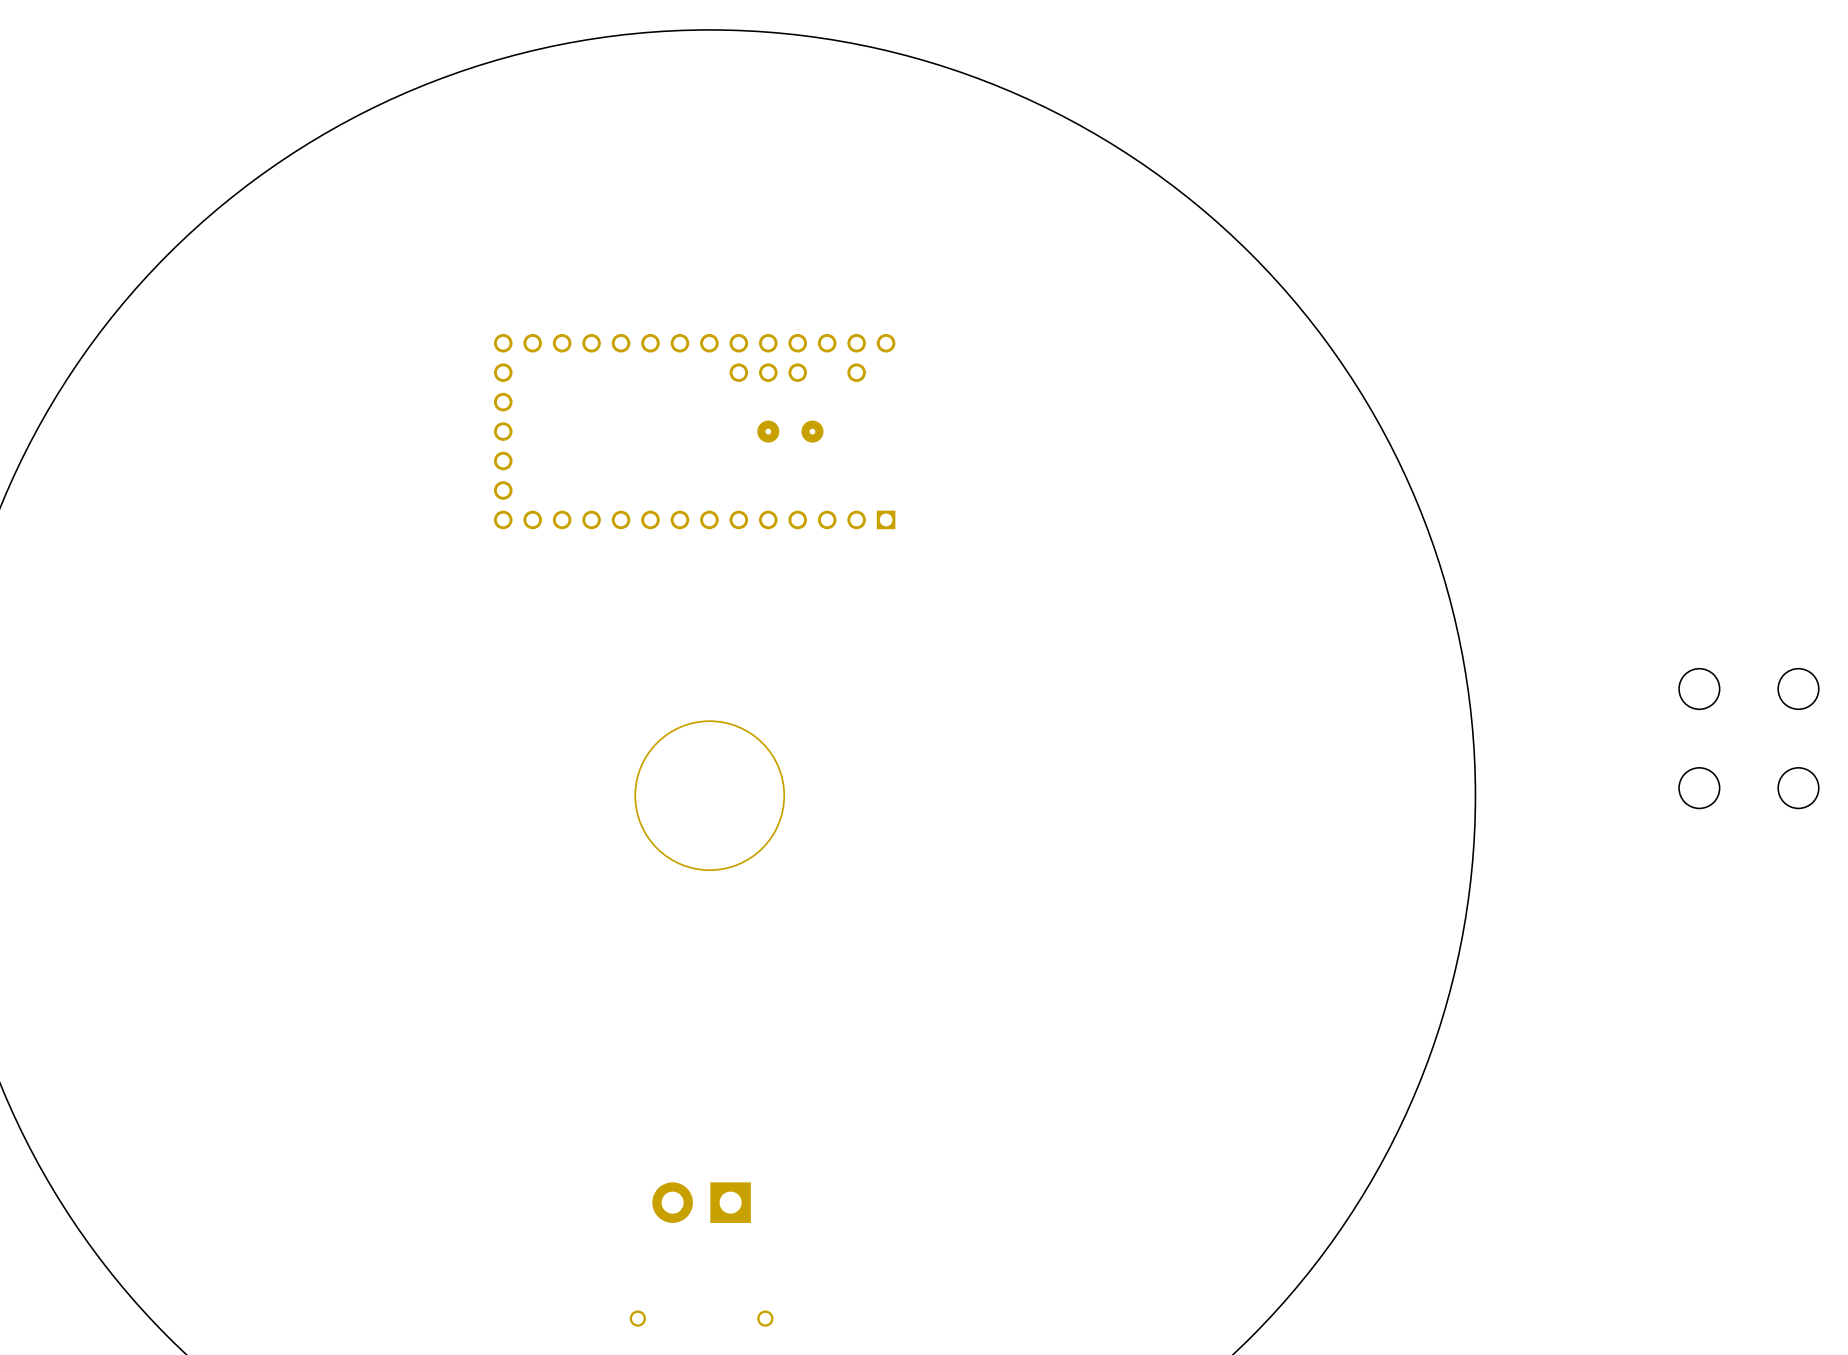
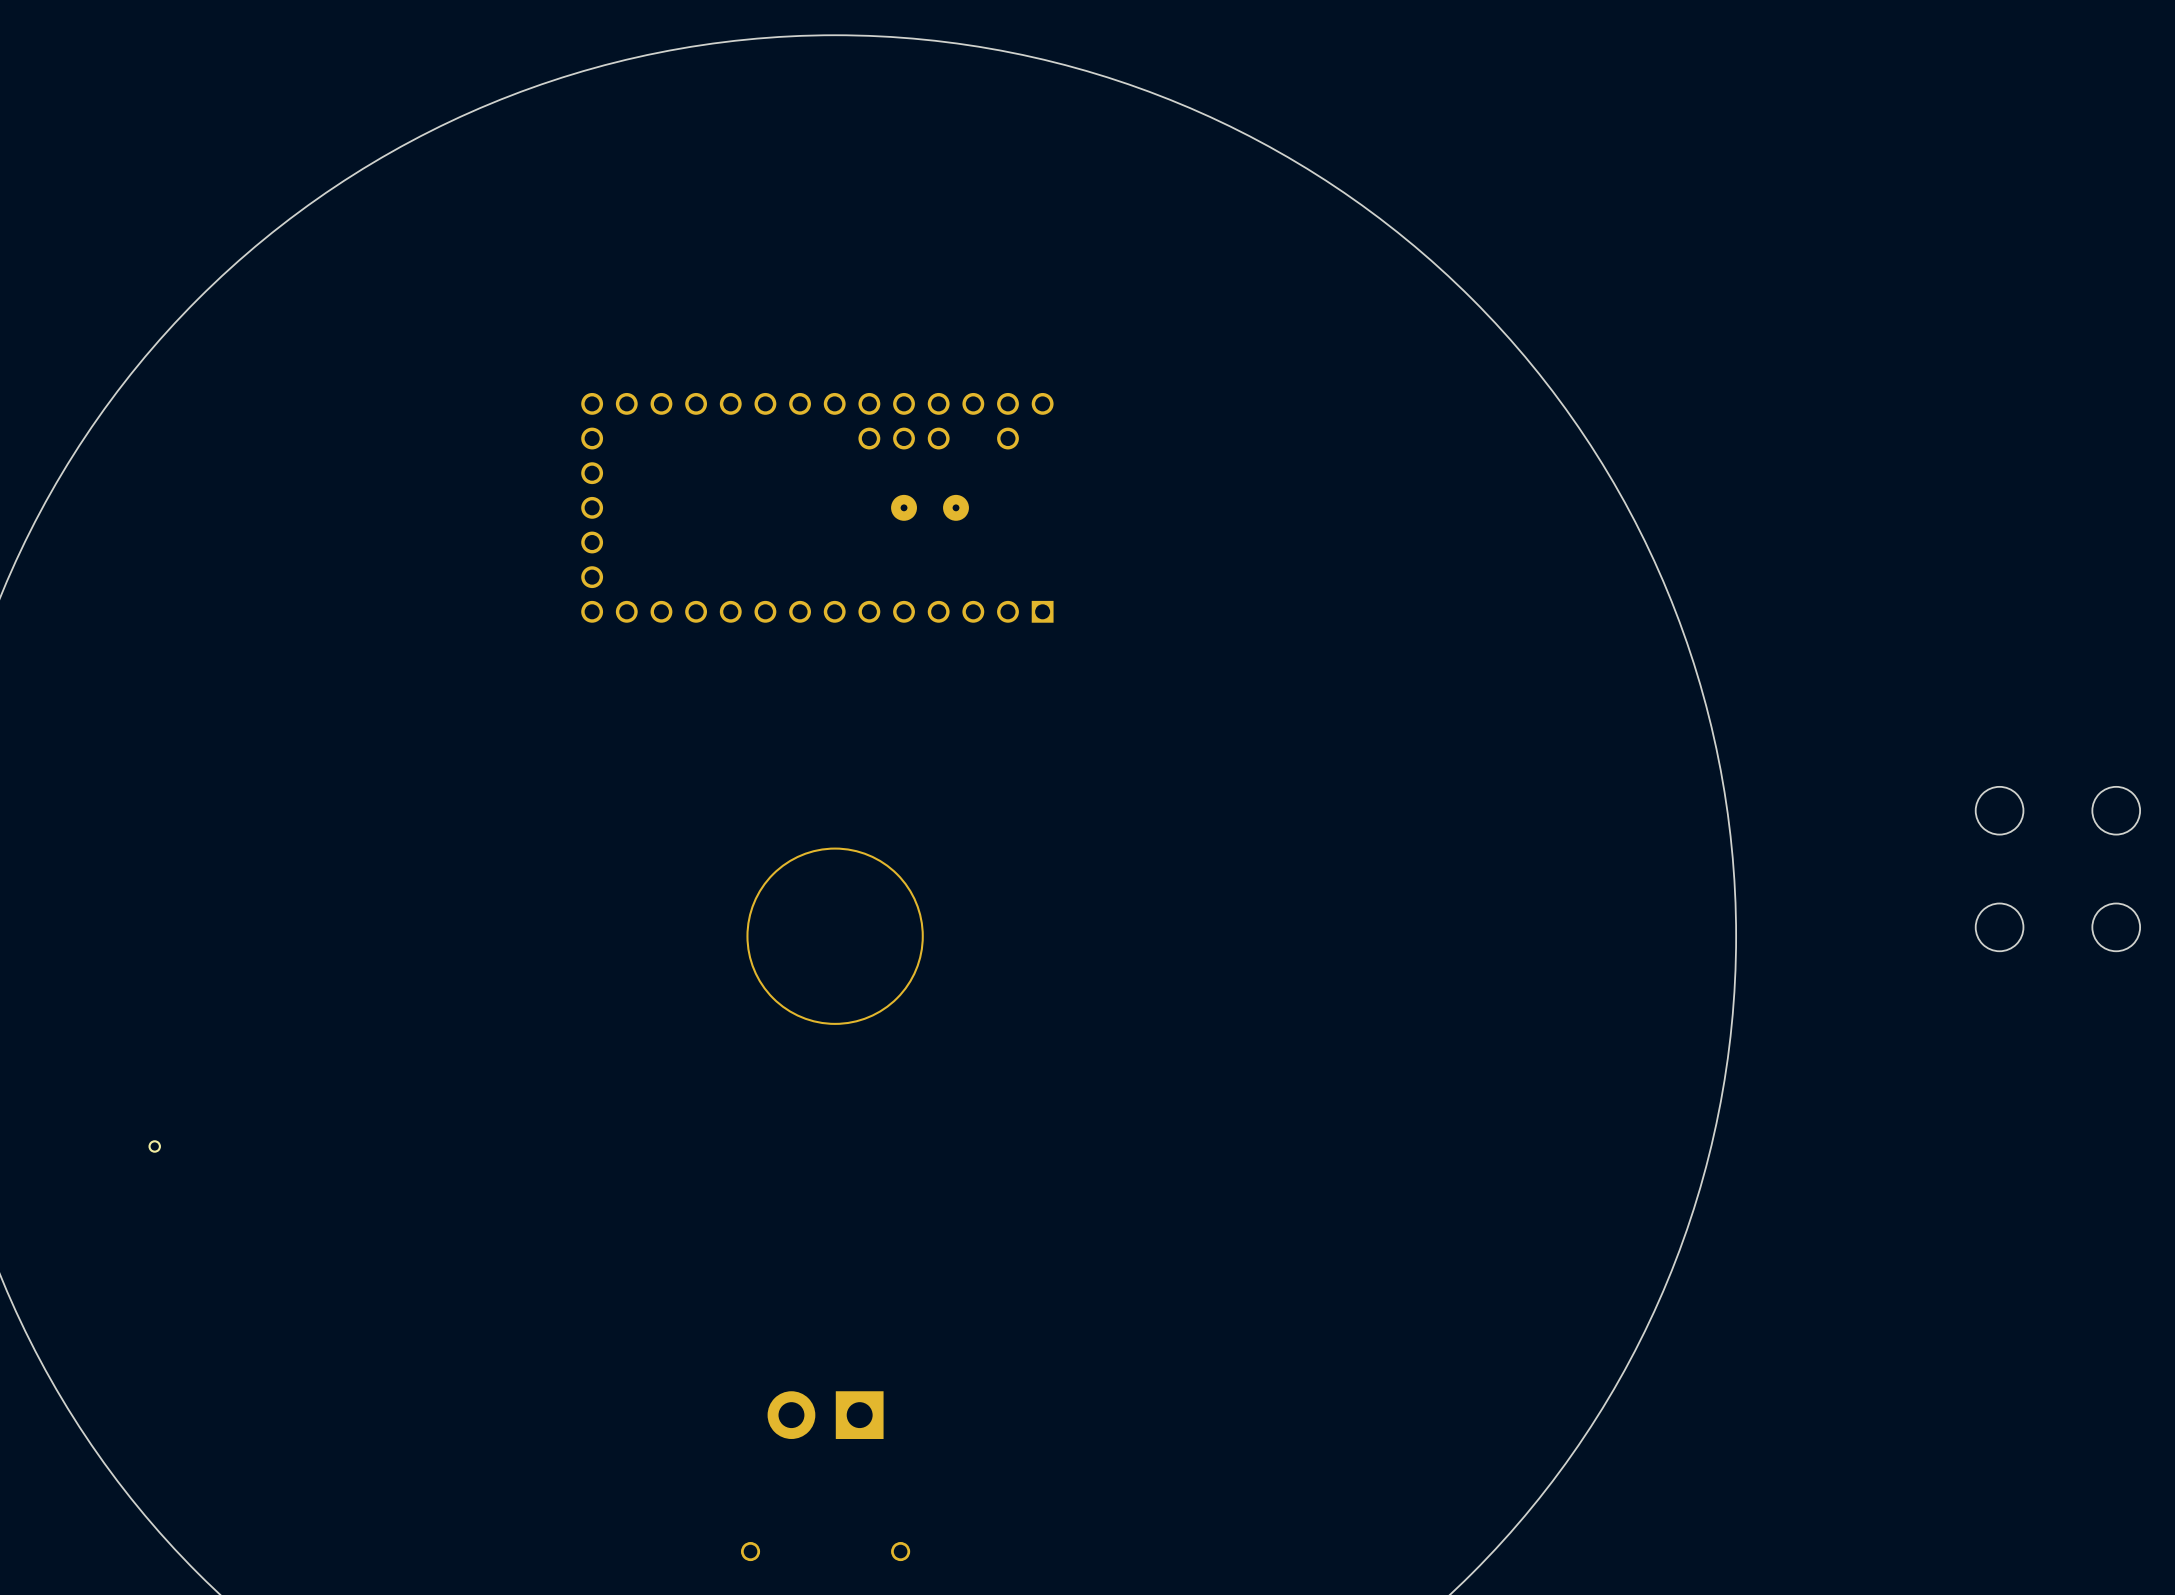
part: none -> (154, 1146)

